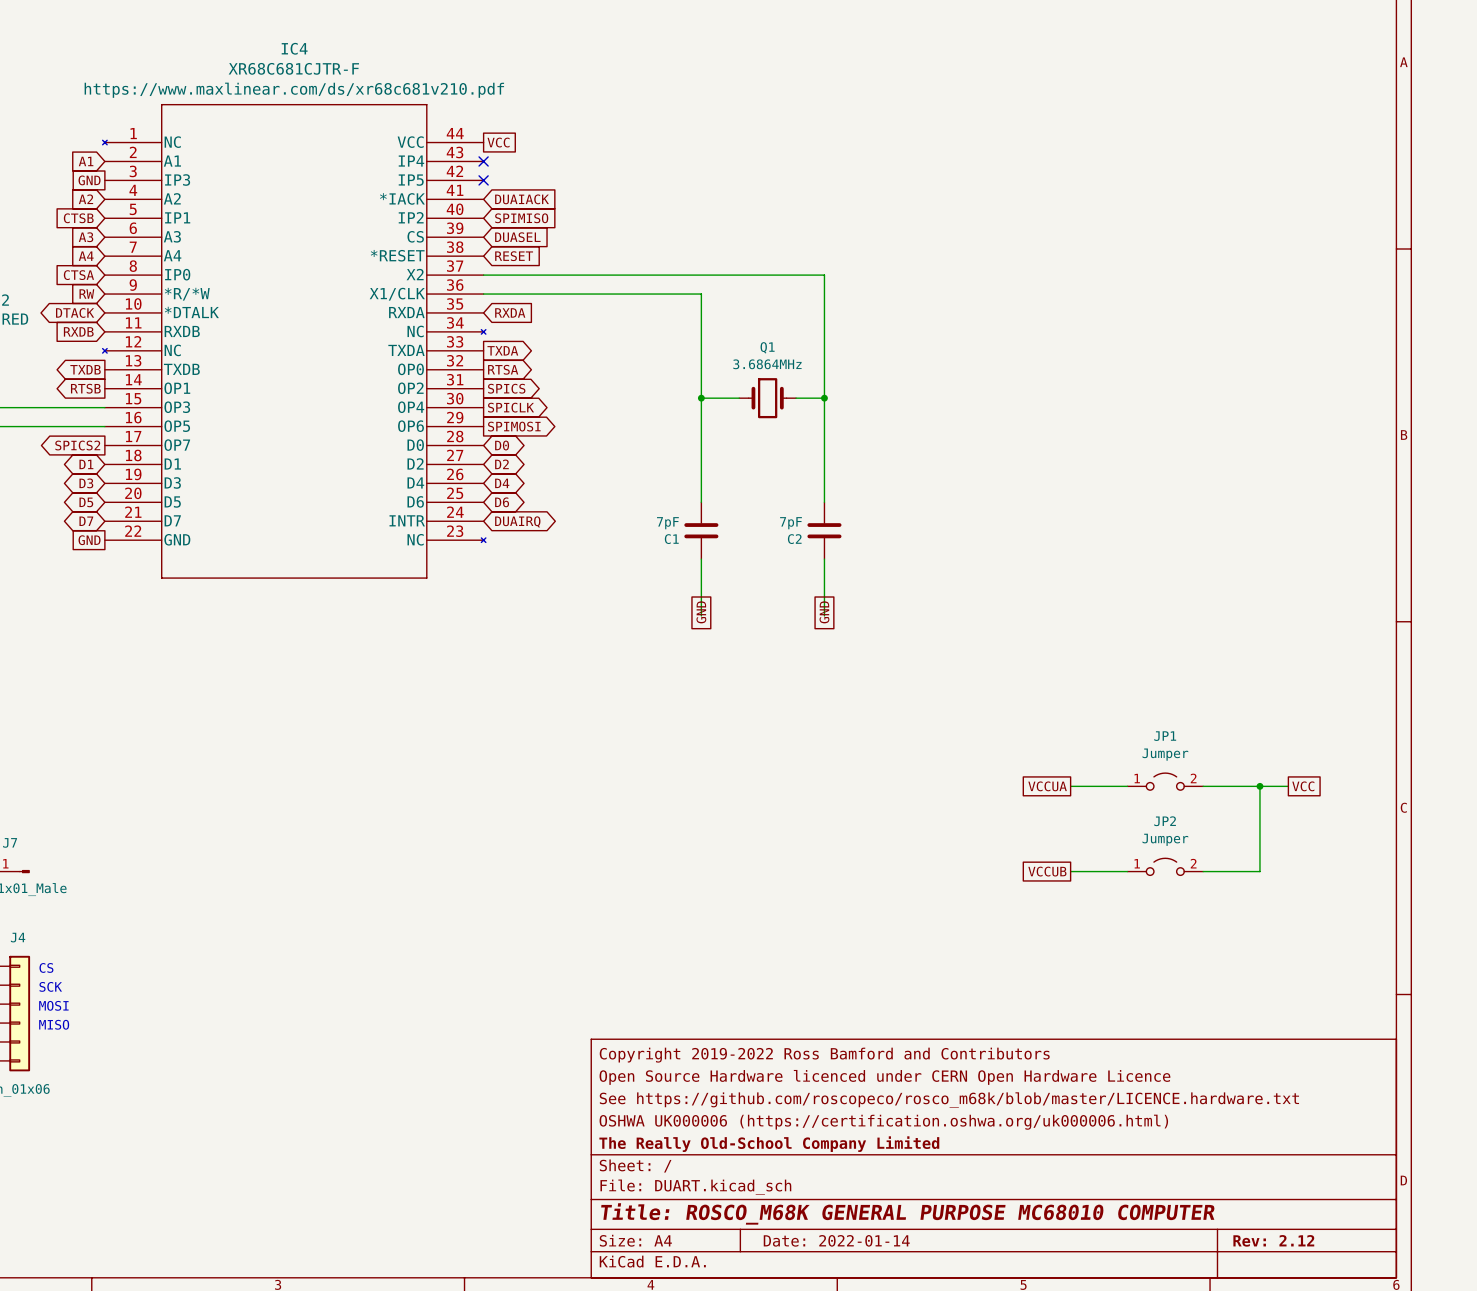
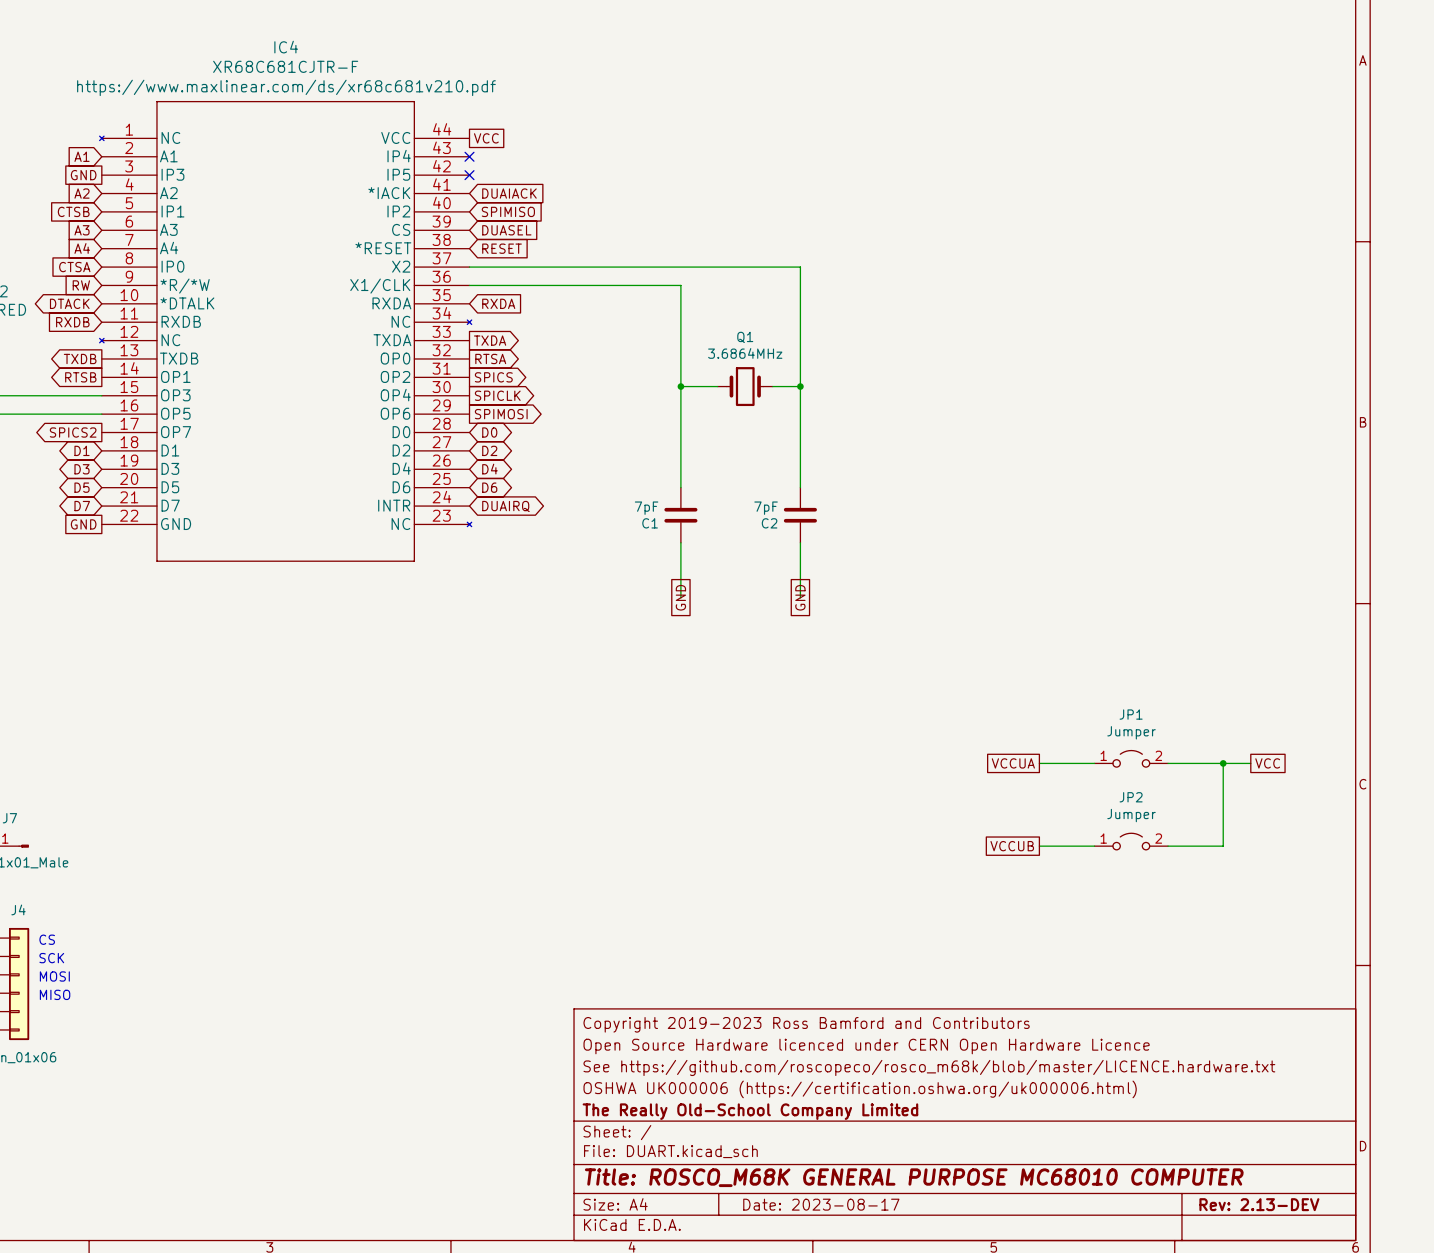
title block: Copyright 2019-2022 Ross Bamford and Contributors (824, 1055) -> Copyright 2019-2023 Ross Bamford and Contributors (806, 1024)
title block: Date: 2022-01-14 (836, 1240) -> Date: 2023-08-17 (821, 1204)
title block: Rev: 2.12 (1273, 1240) -> Rev: 2.13-DEV (1259, 1204)

